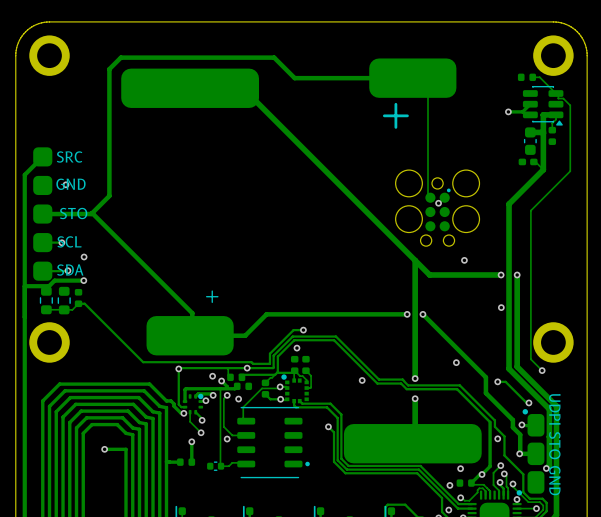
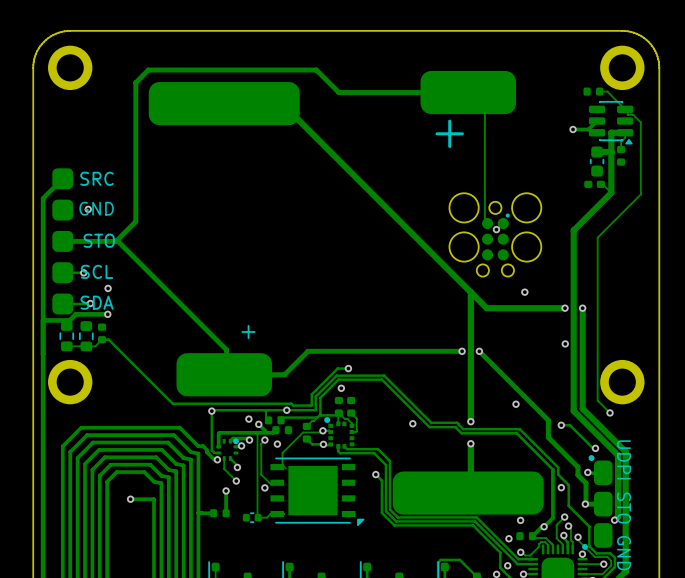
part footprint: [237, 406, 310, 479] -> [270, 457, 365, 527]

